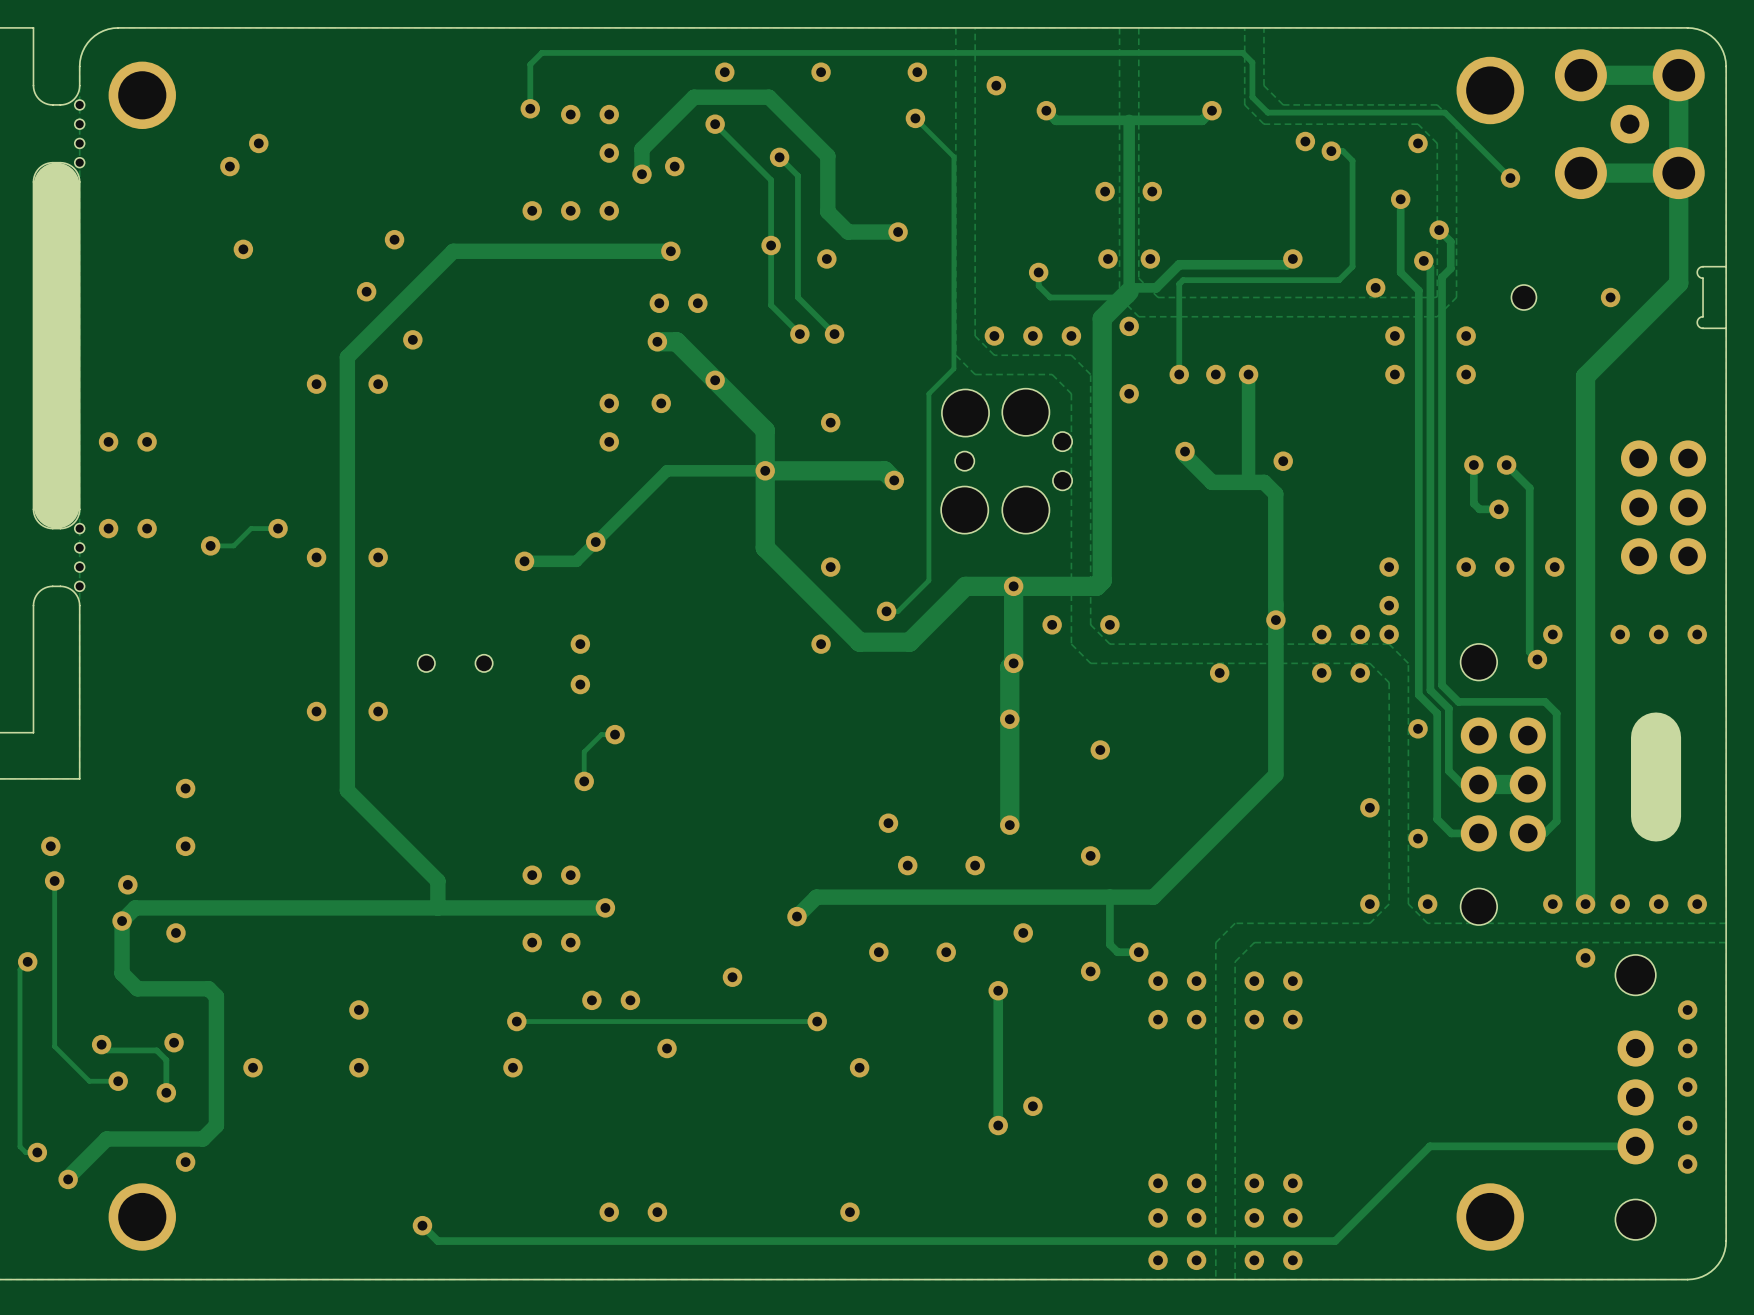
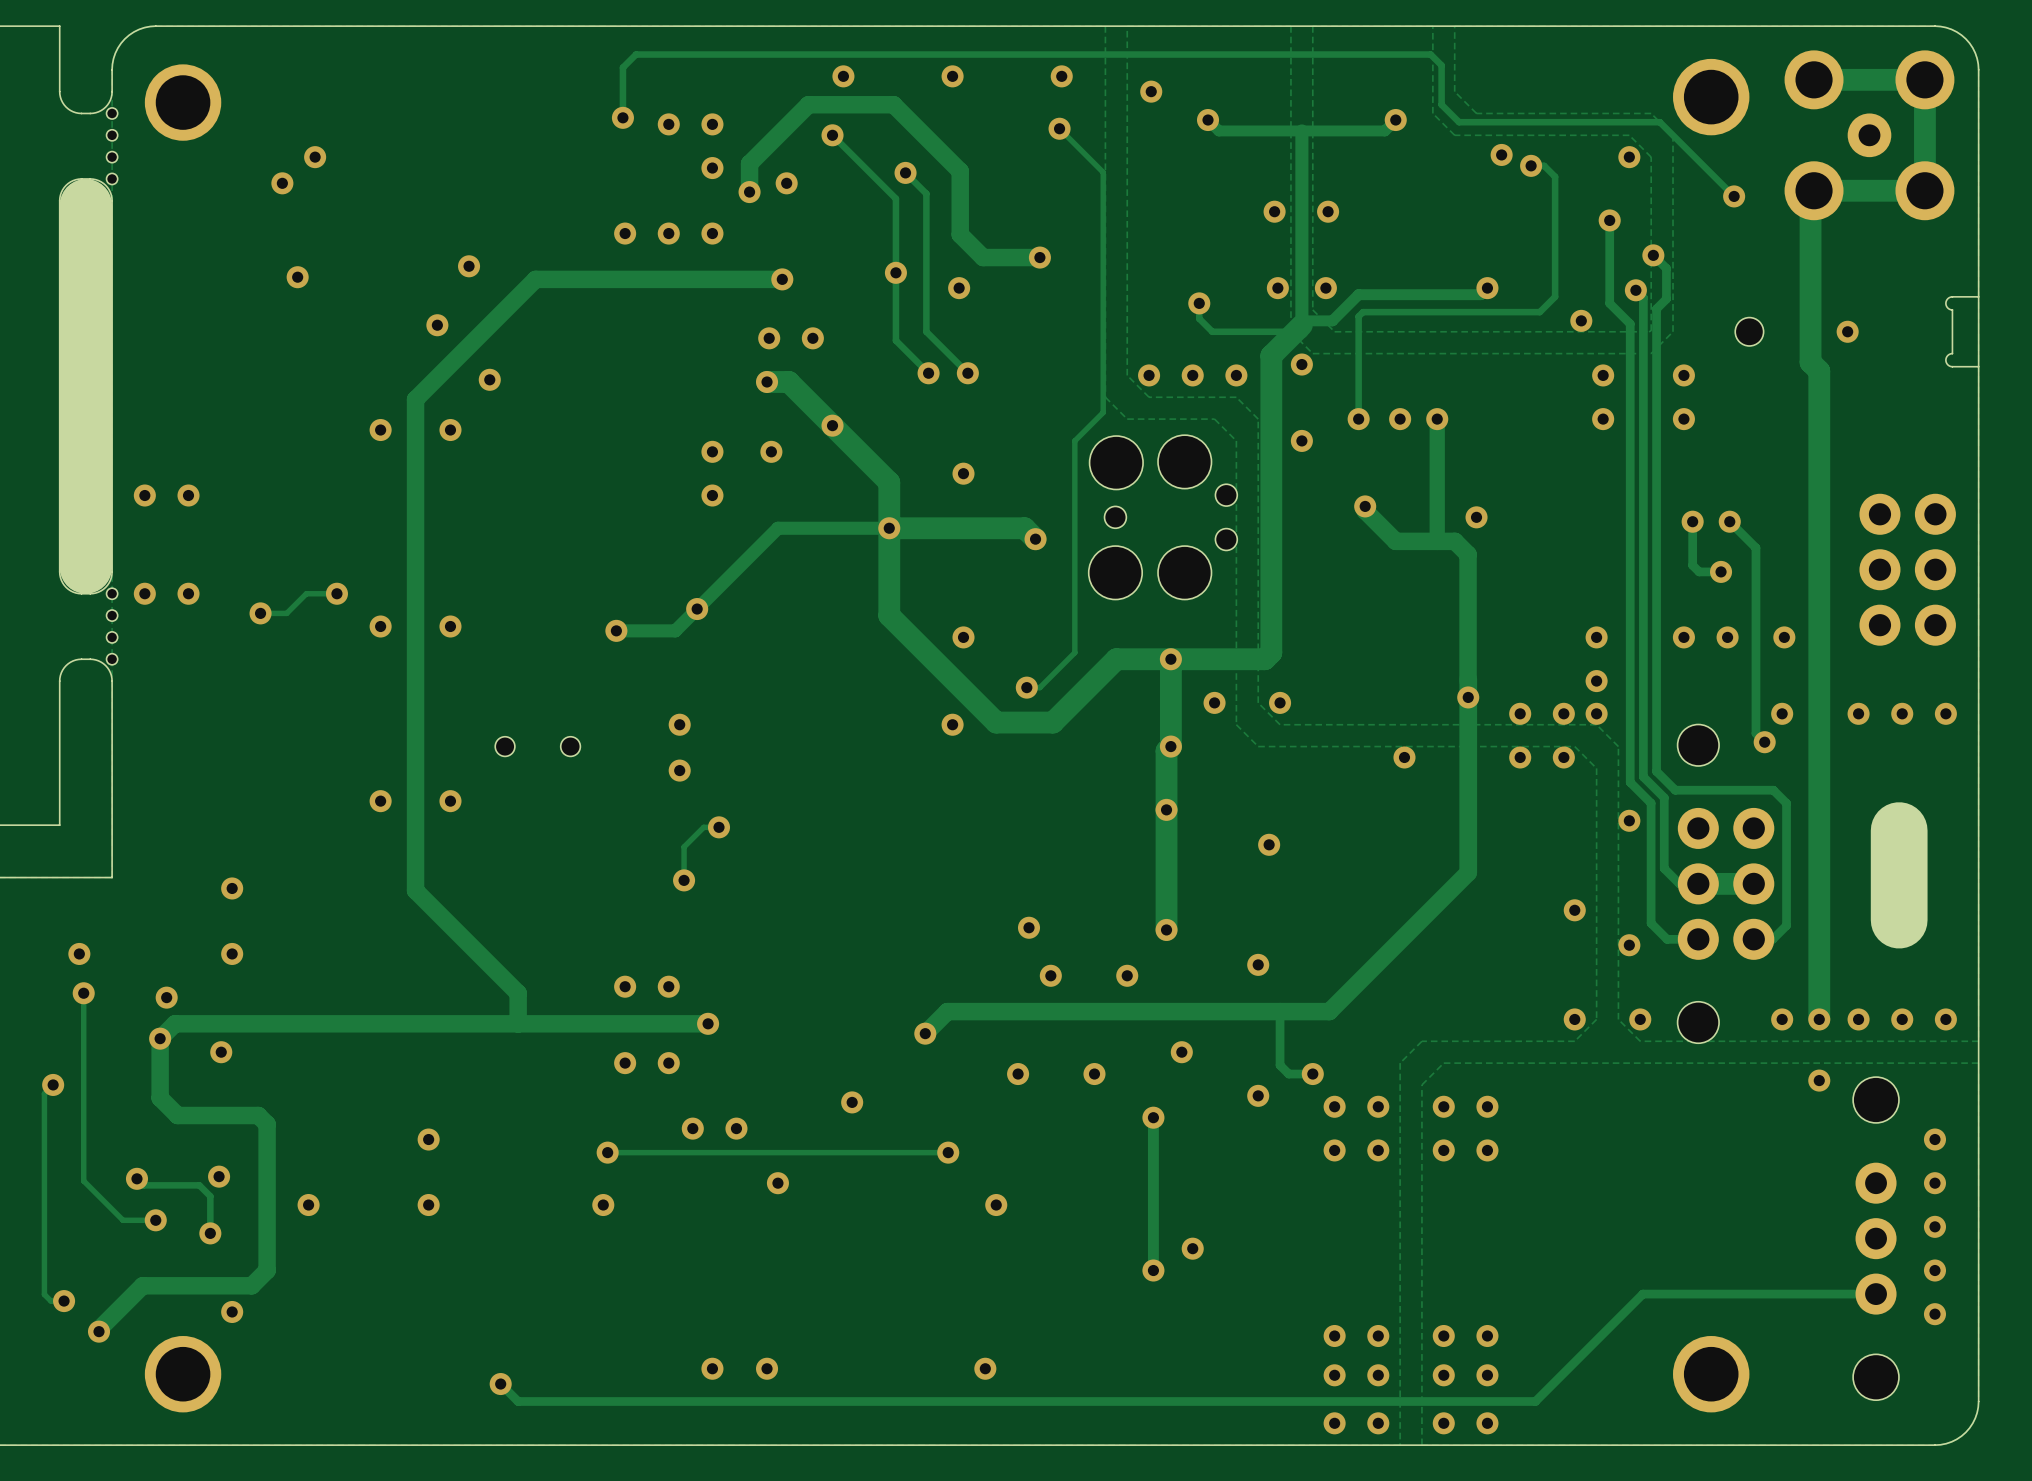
track: (1678, 173) (1678, 283) (1585, 376) -> (1814, 190) (1810, 194) (1810, 362) (1819, 371) (1819, 421)

